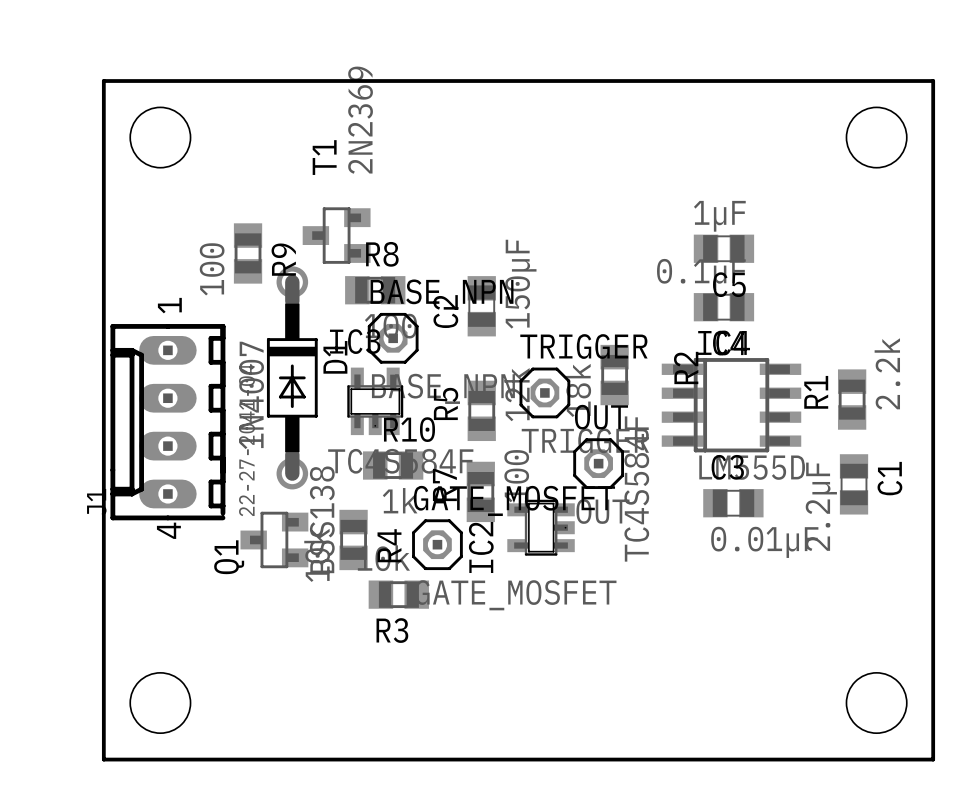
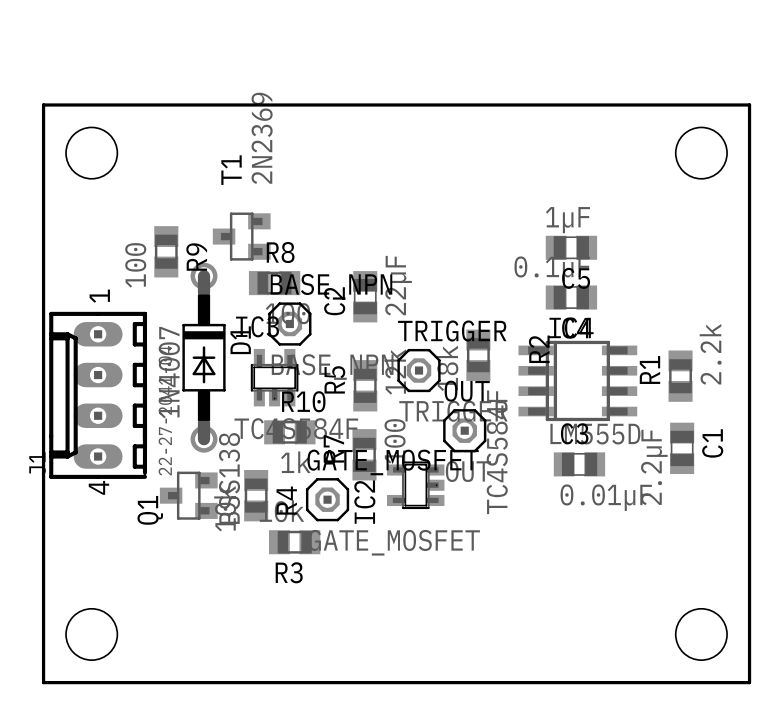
C2 value: 150µF (520, 284) -> 22µF (398, 285)

